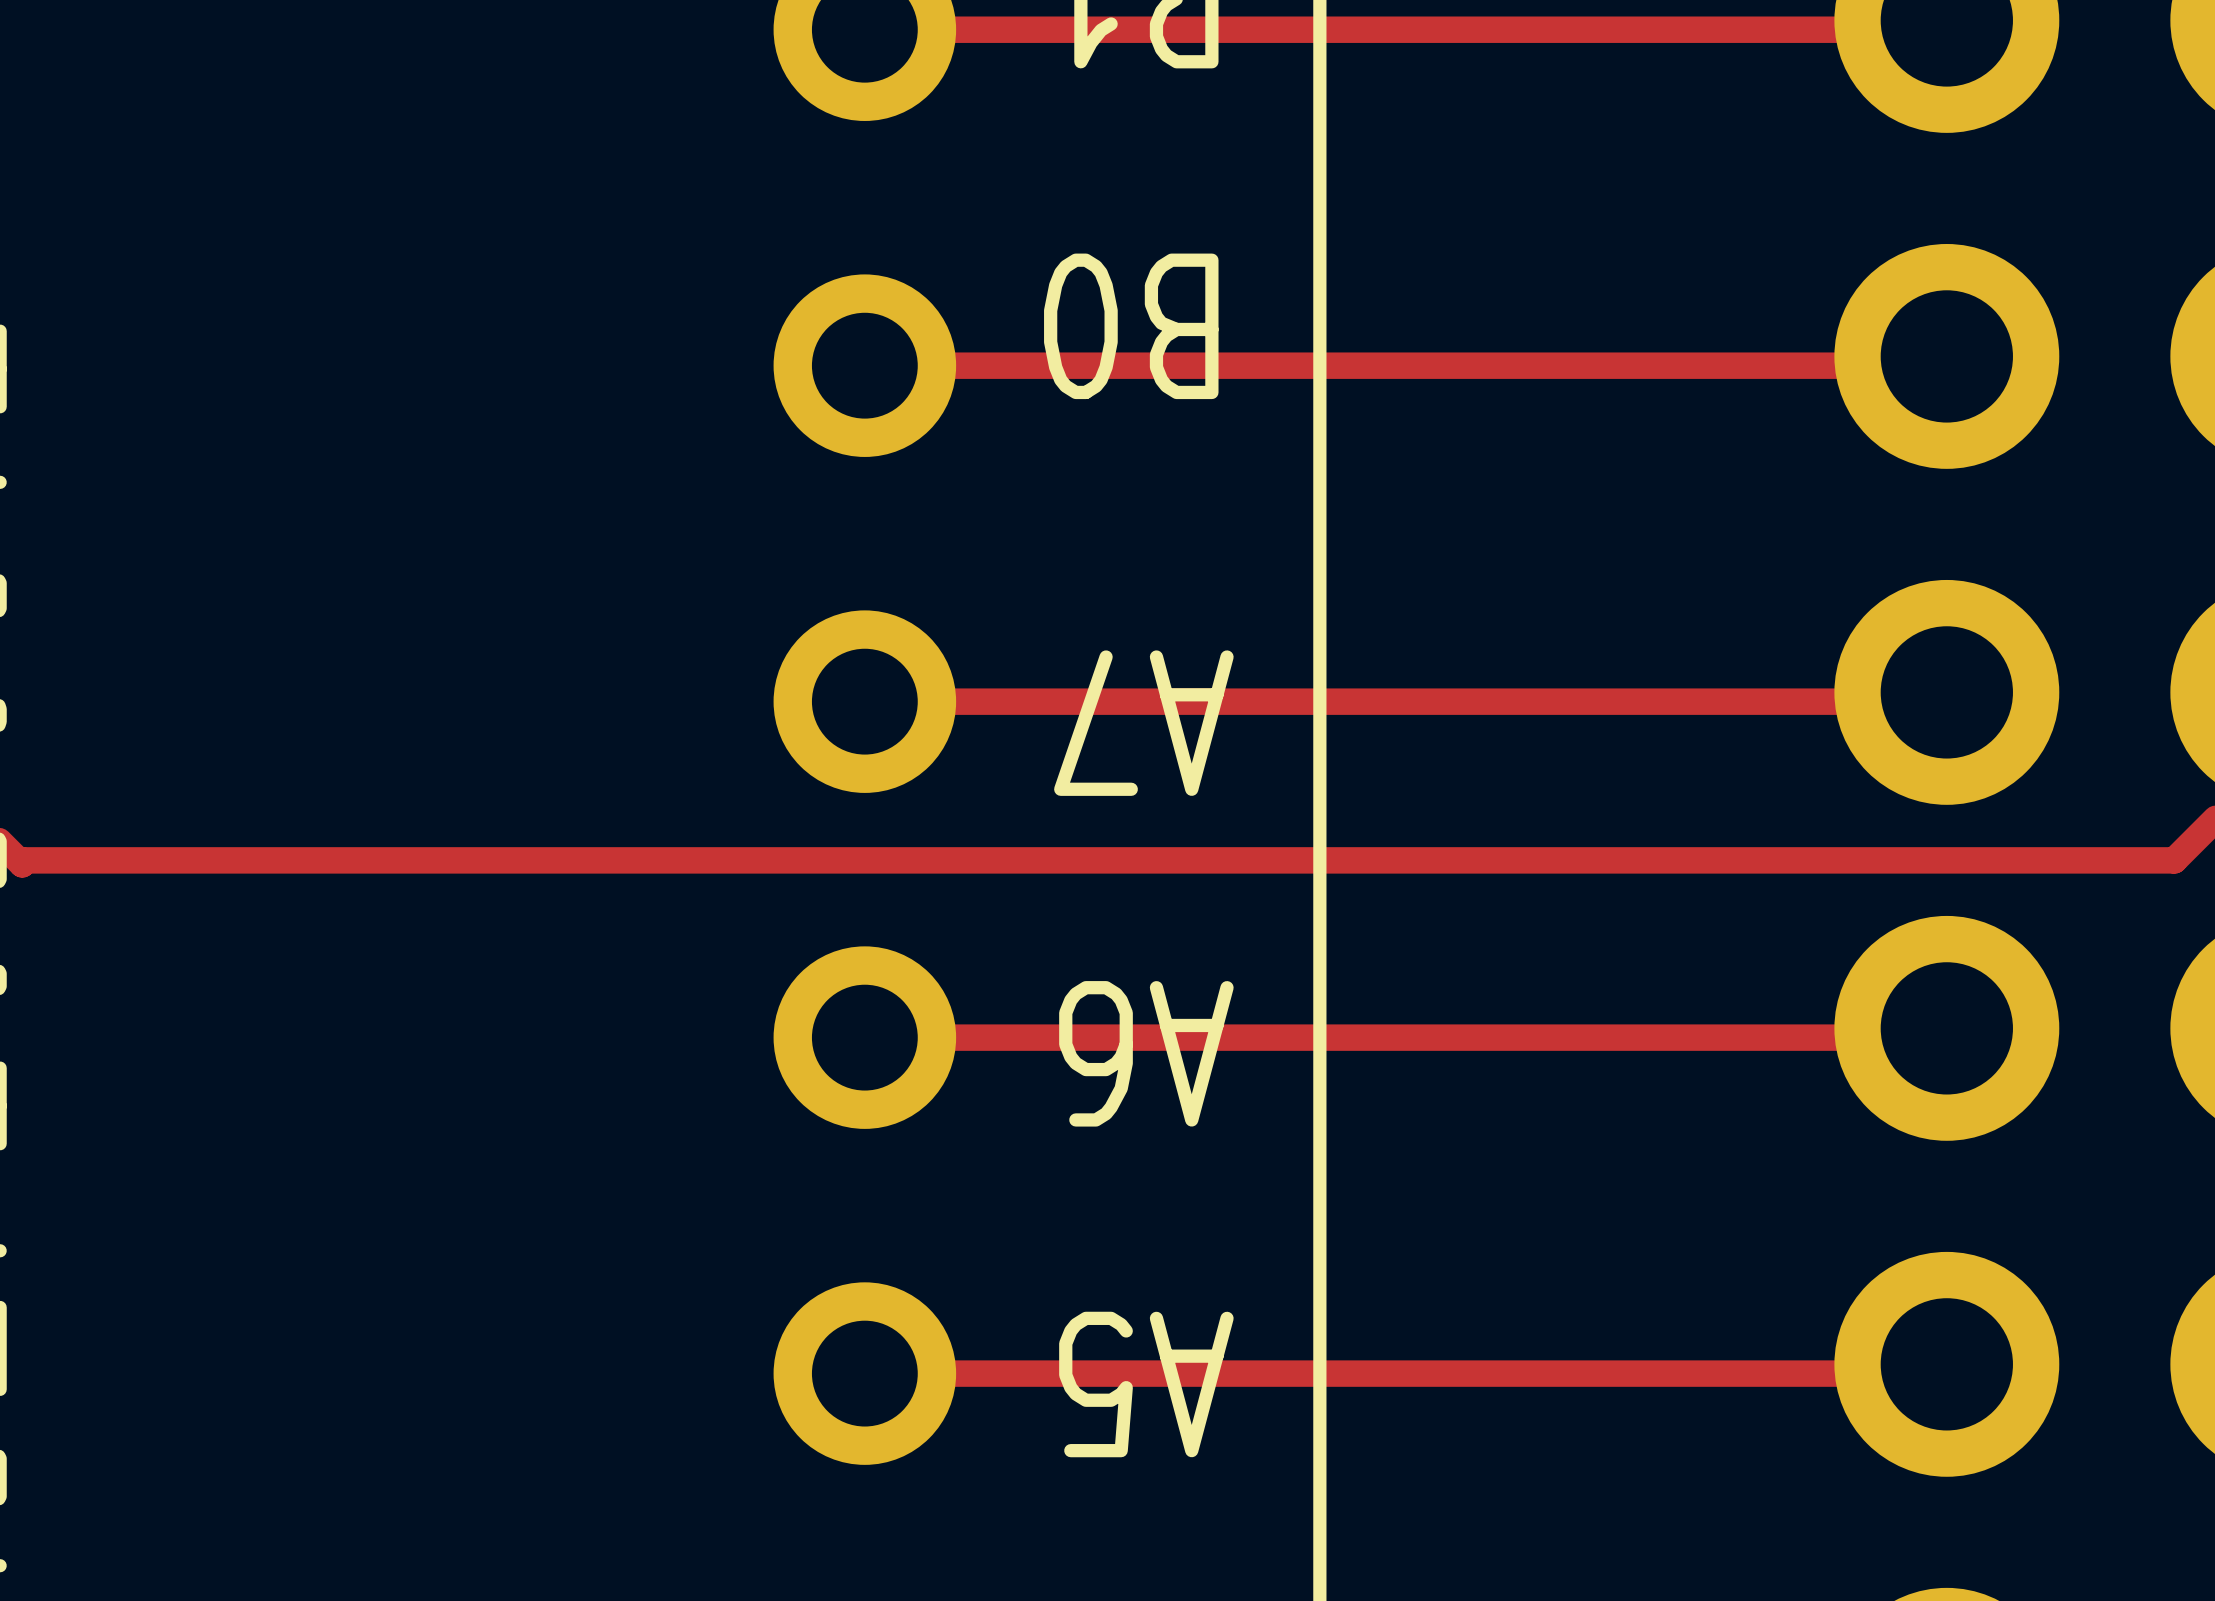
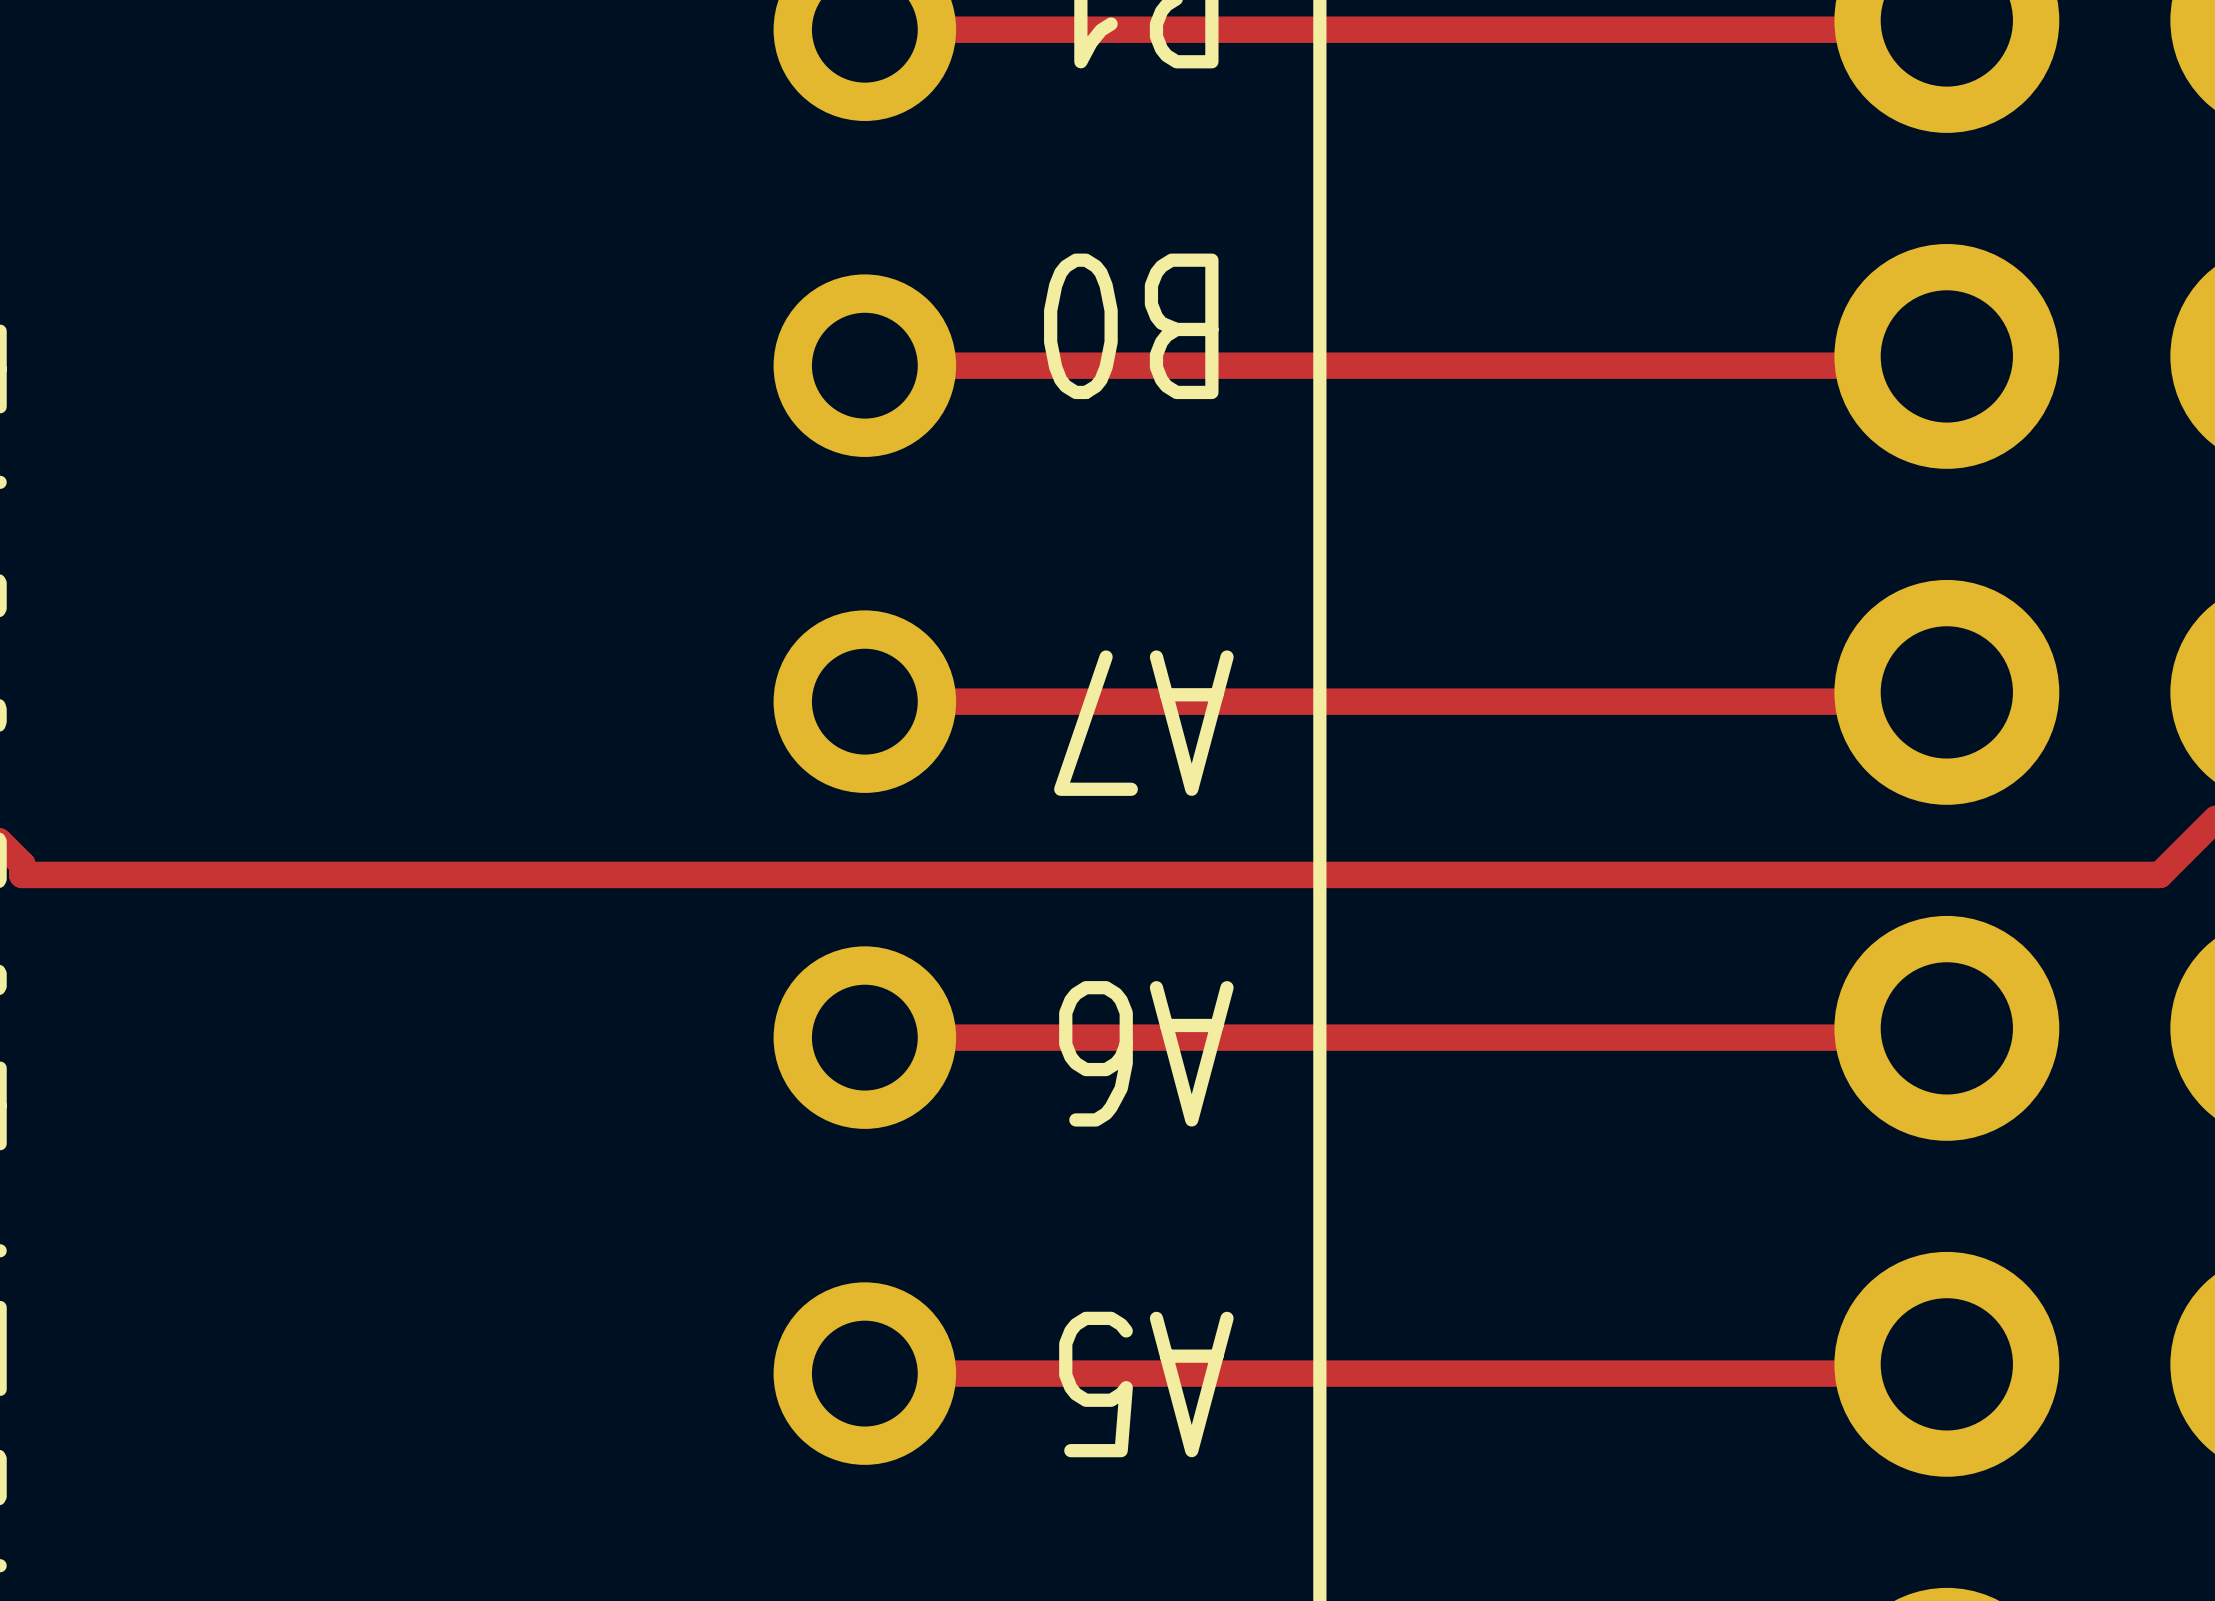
track: (2174, 860) (22, 860) (22, 864) -> (2174, 860) (2159, 874) (22, 874) (22, 864)

